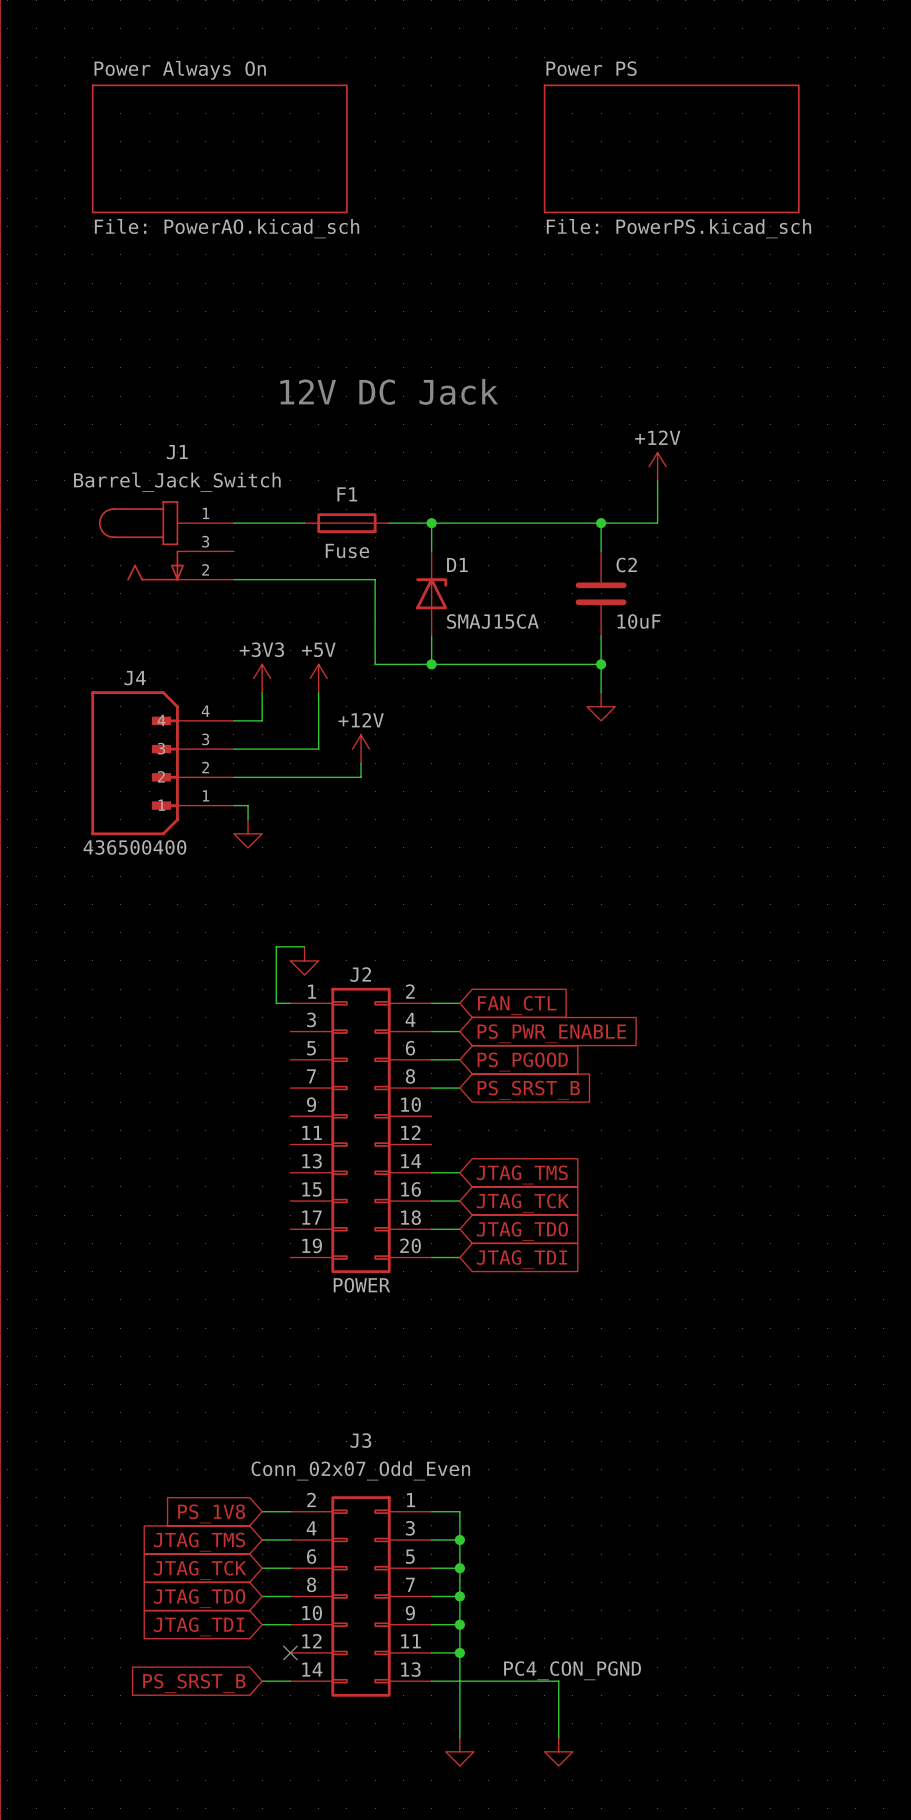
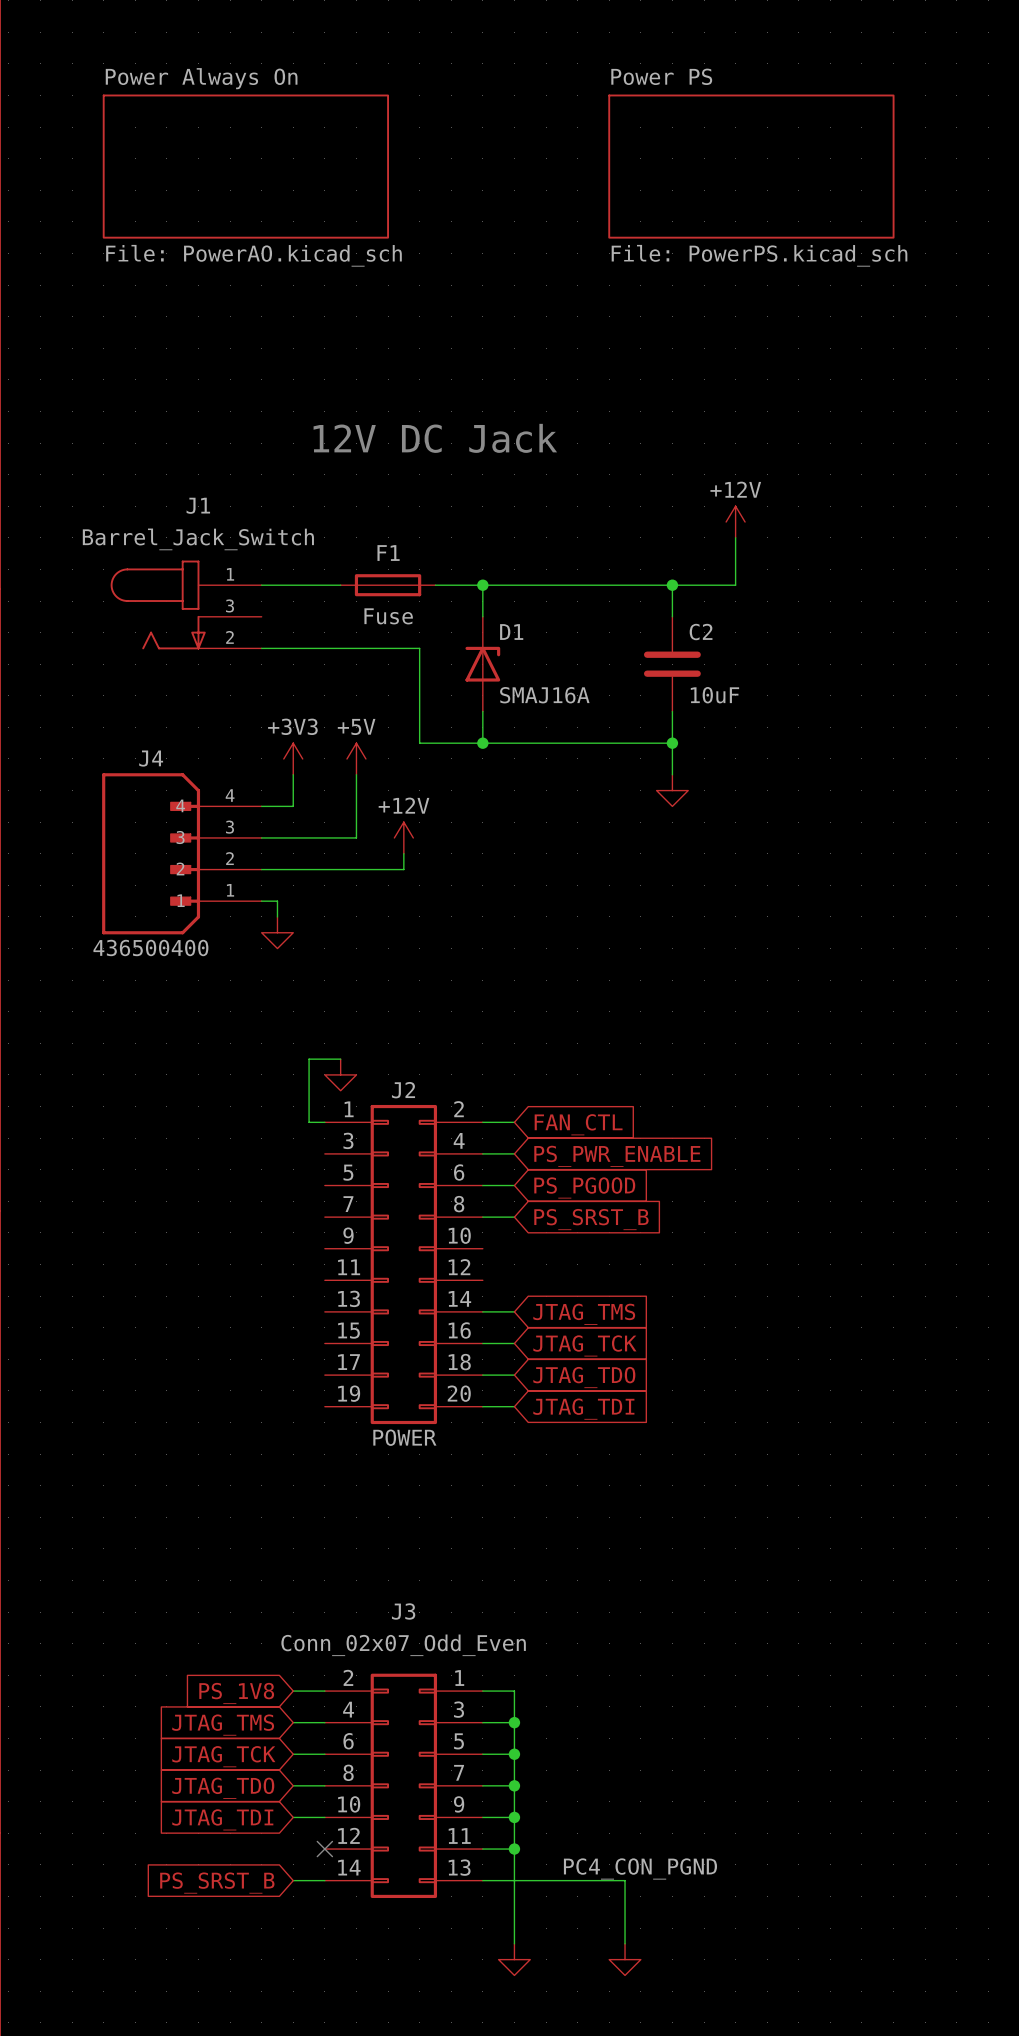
D1 value: SMAJ15CA (492, 621) -> SMAJ16A (544, 695)

